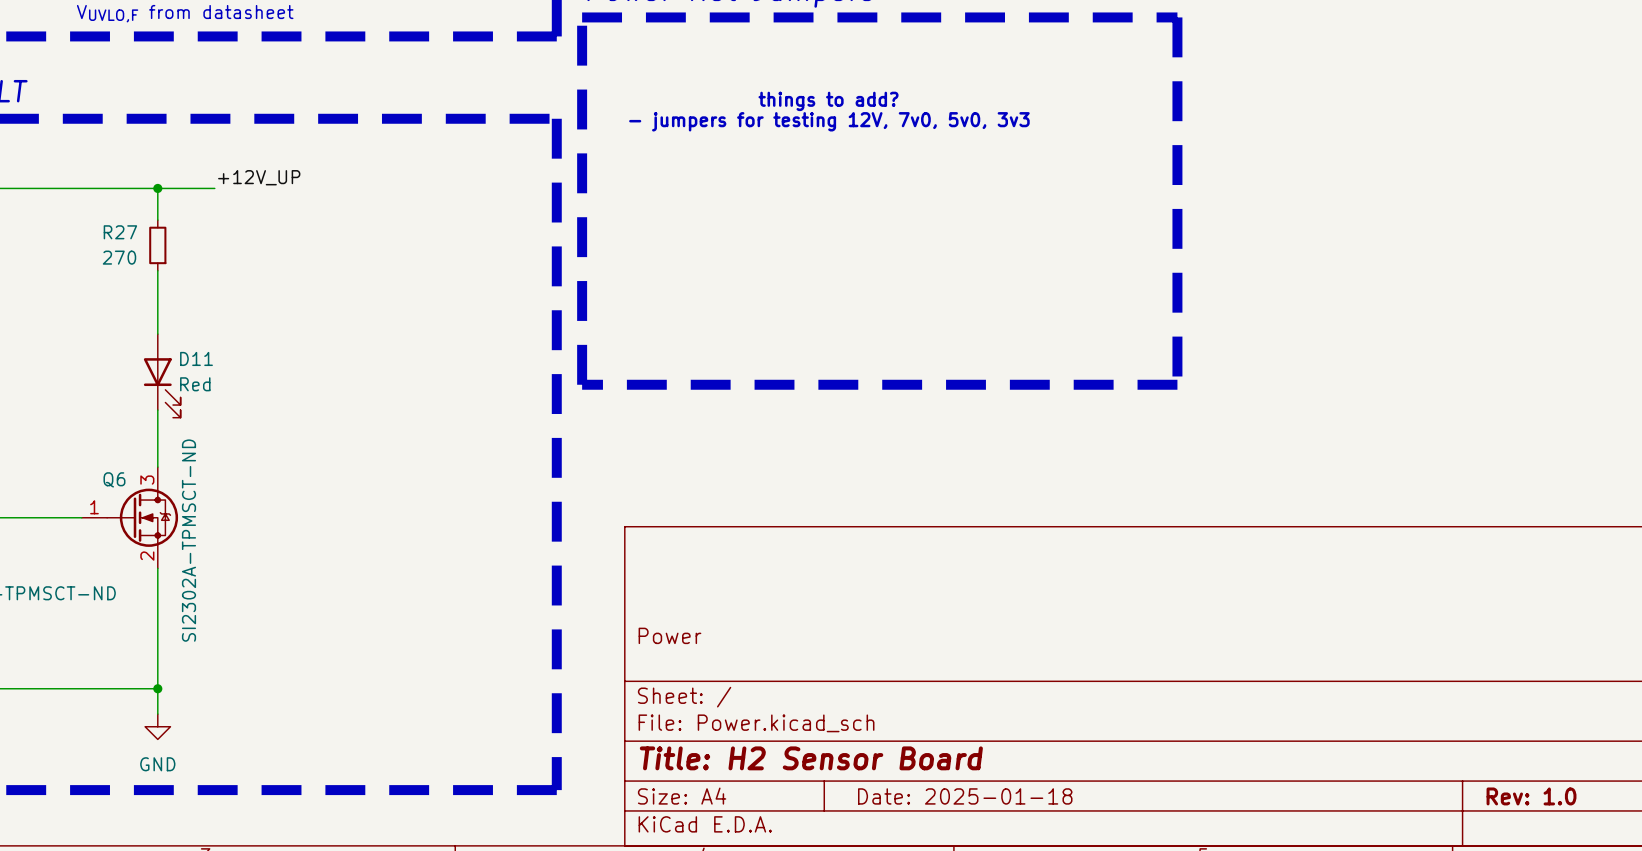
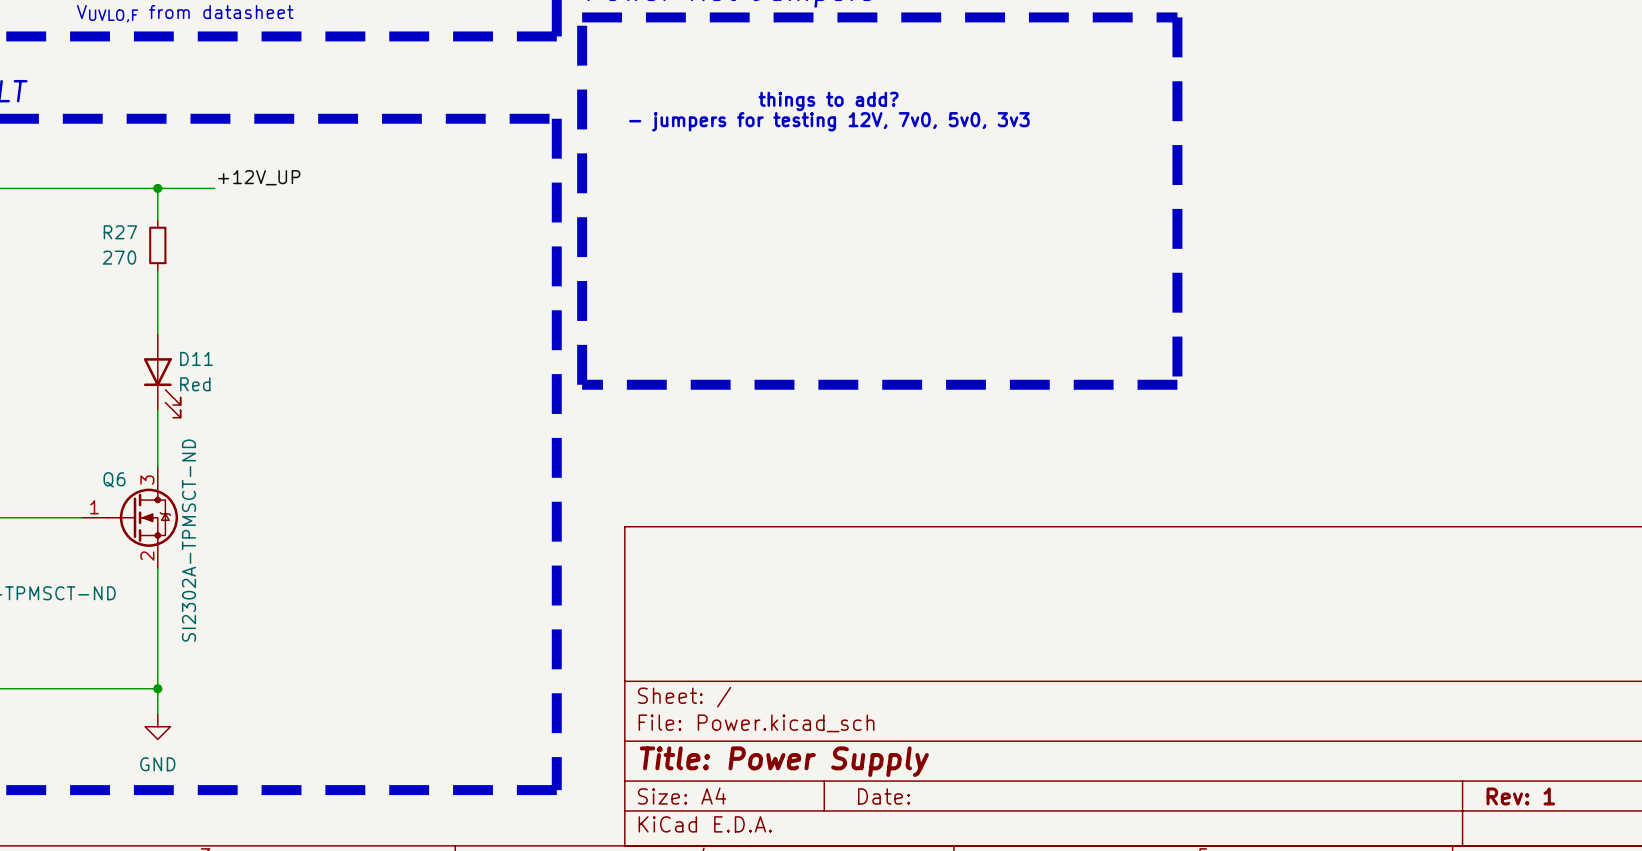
title block: Power (669, 635) -> none
title block: Title: H2 Sensor Board (811, 758) -> Title: Power Supply (784, 761)
title block: Date: 2025-01-18 (965, 796) -> Date: (884, 796)
title block: Rev: 1.0 (1531, 796) -> Rev: 1 (1520, 796)

